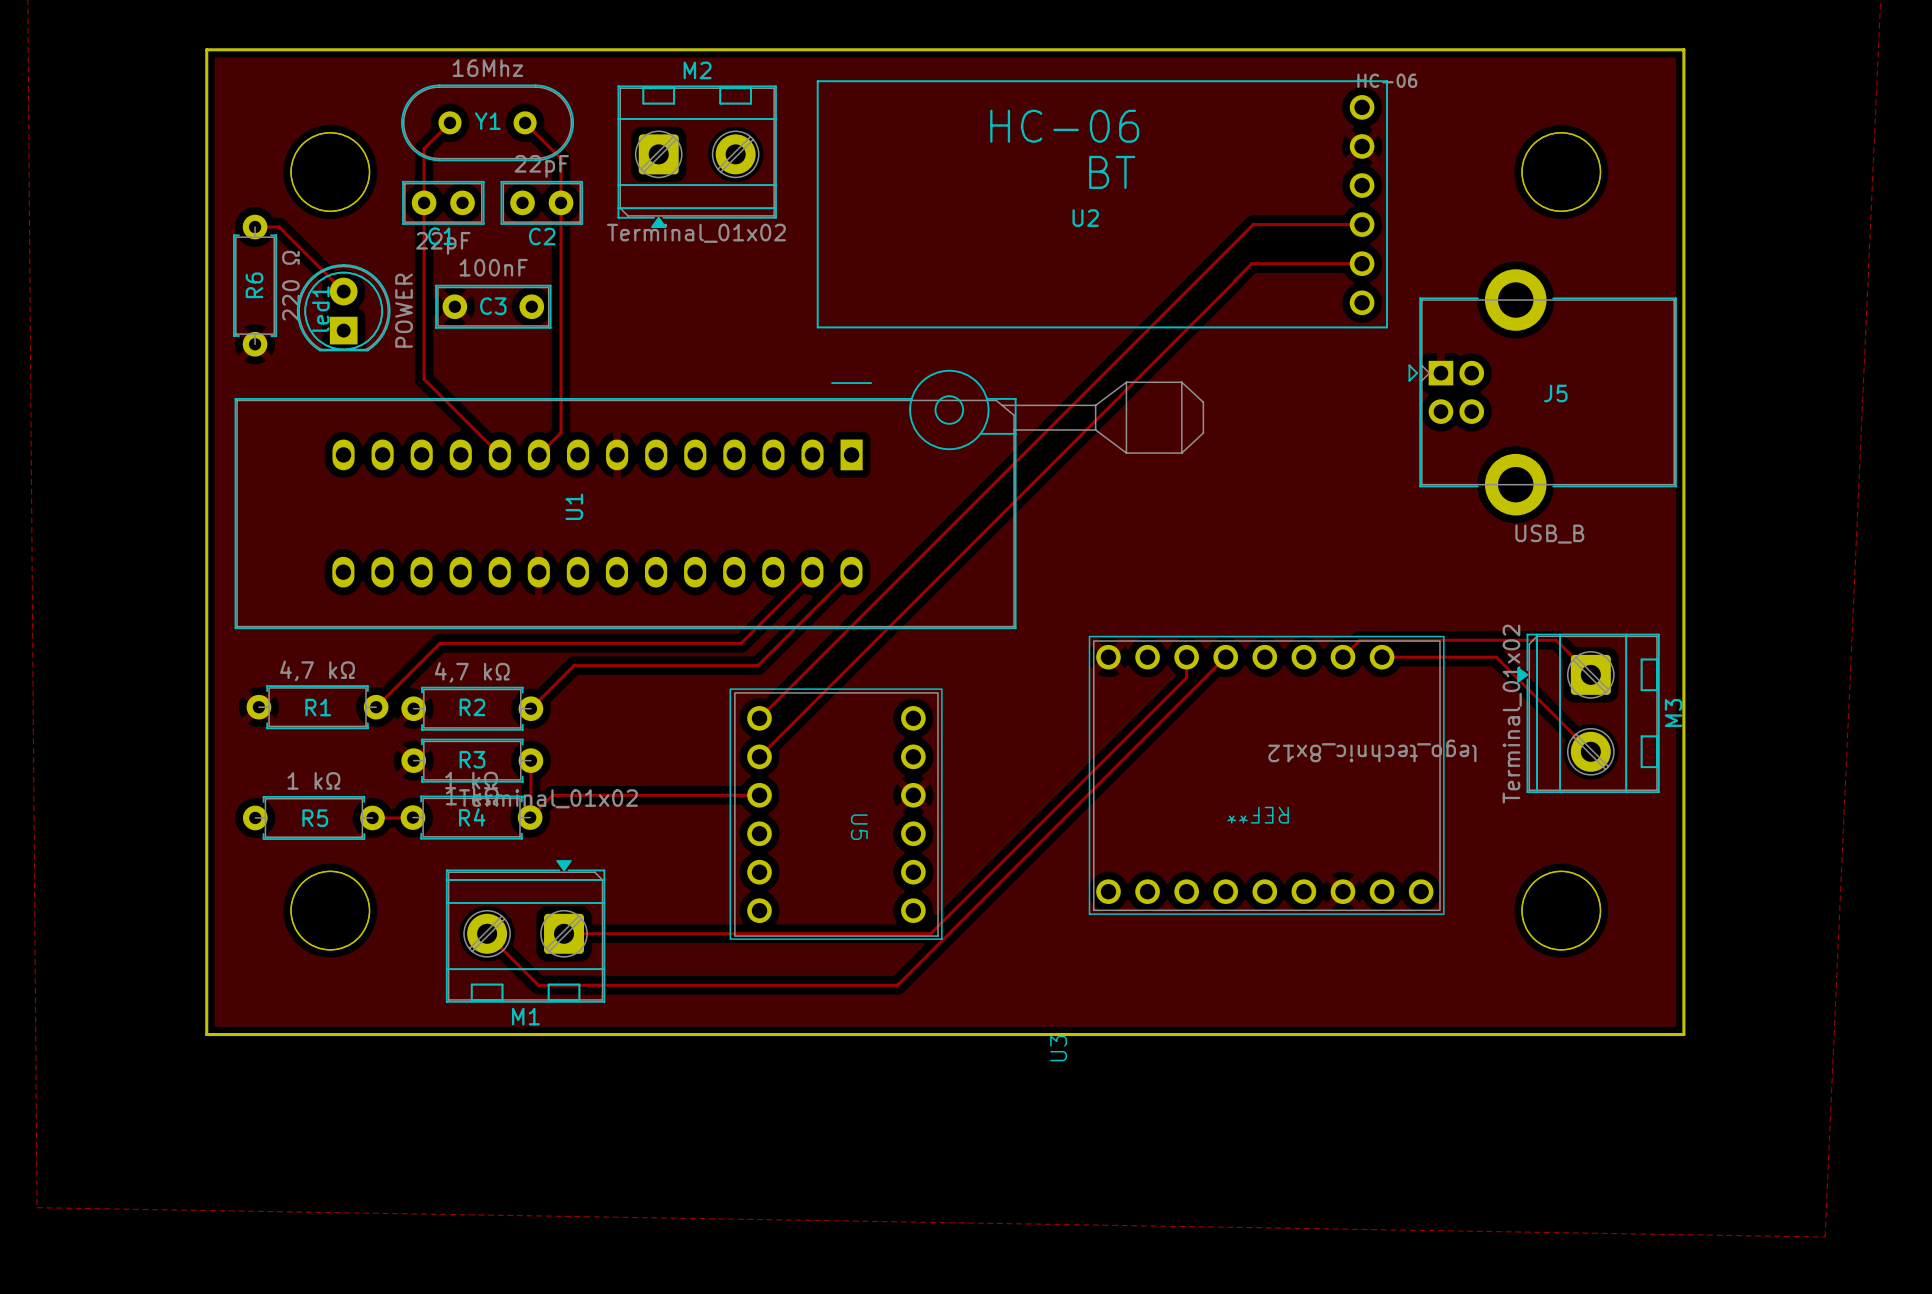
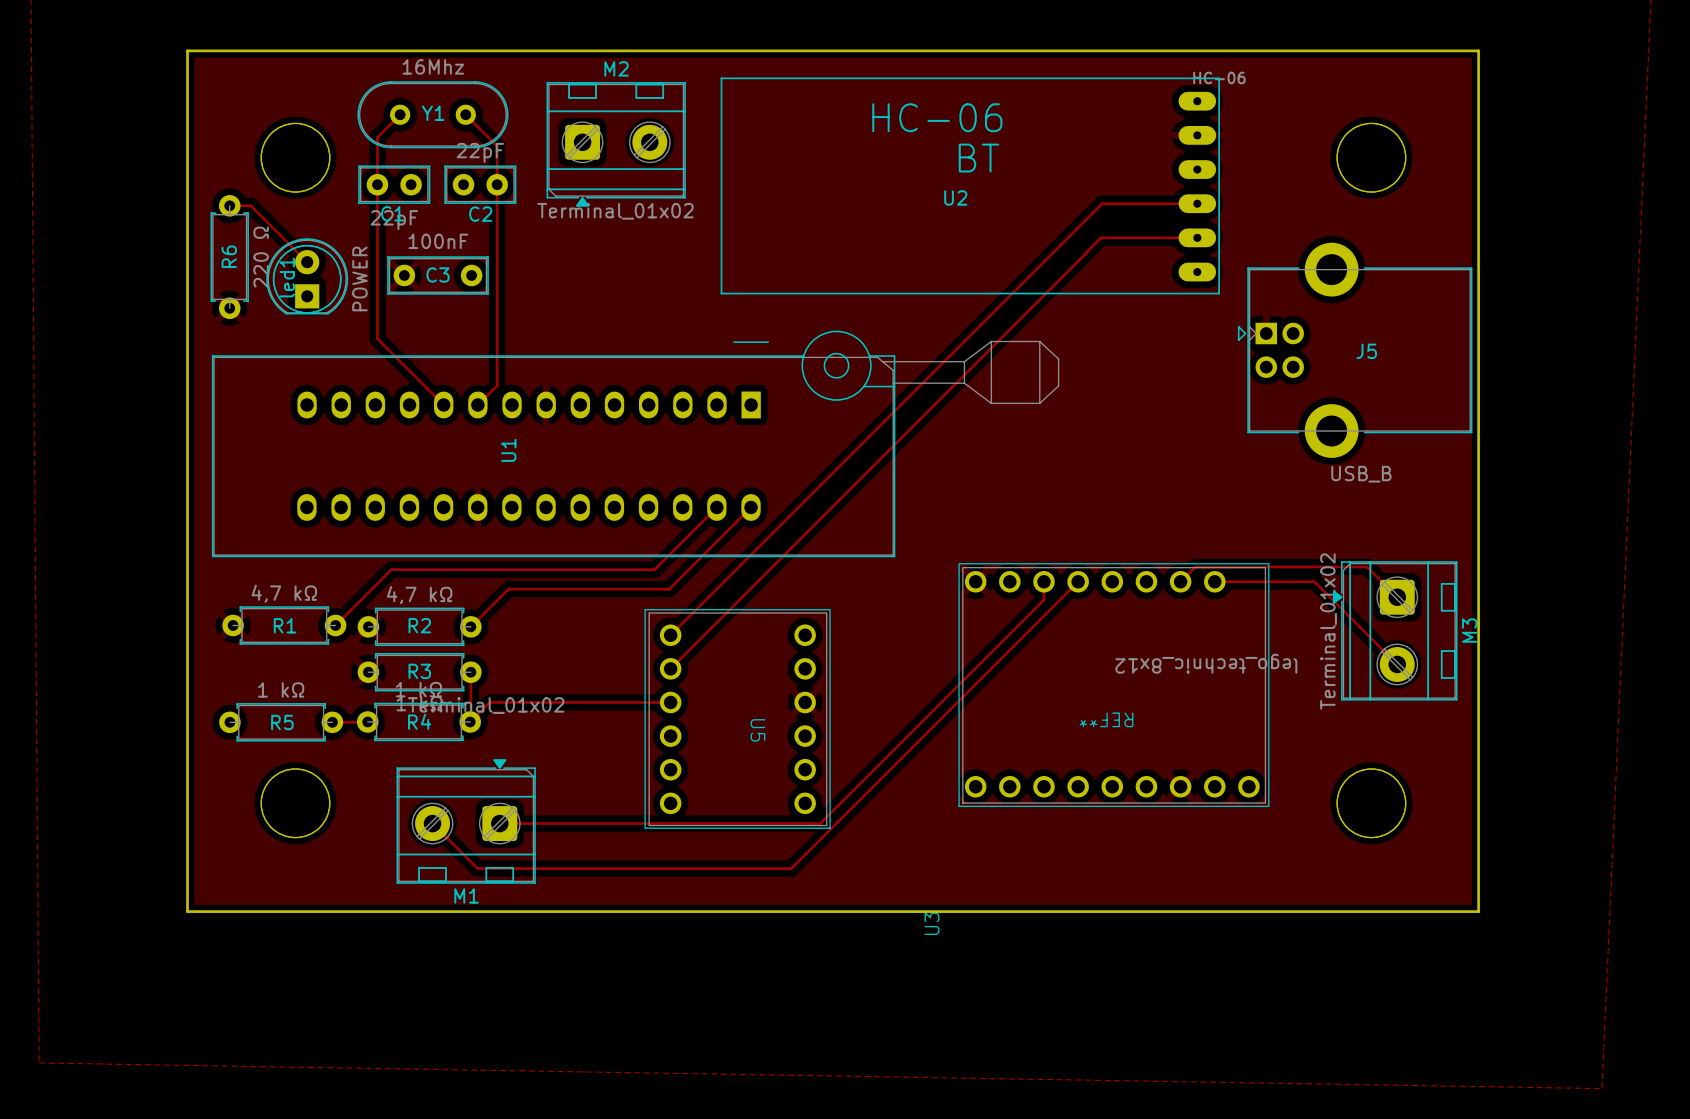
U2 footprint: [816, 80, 1389, 329] -> [720, 77, 1220, 295]

